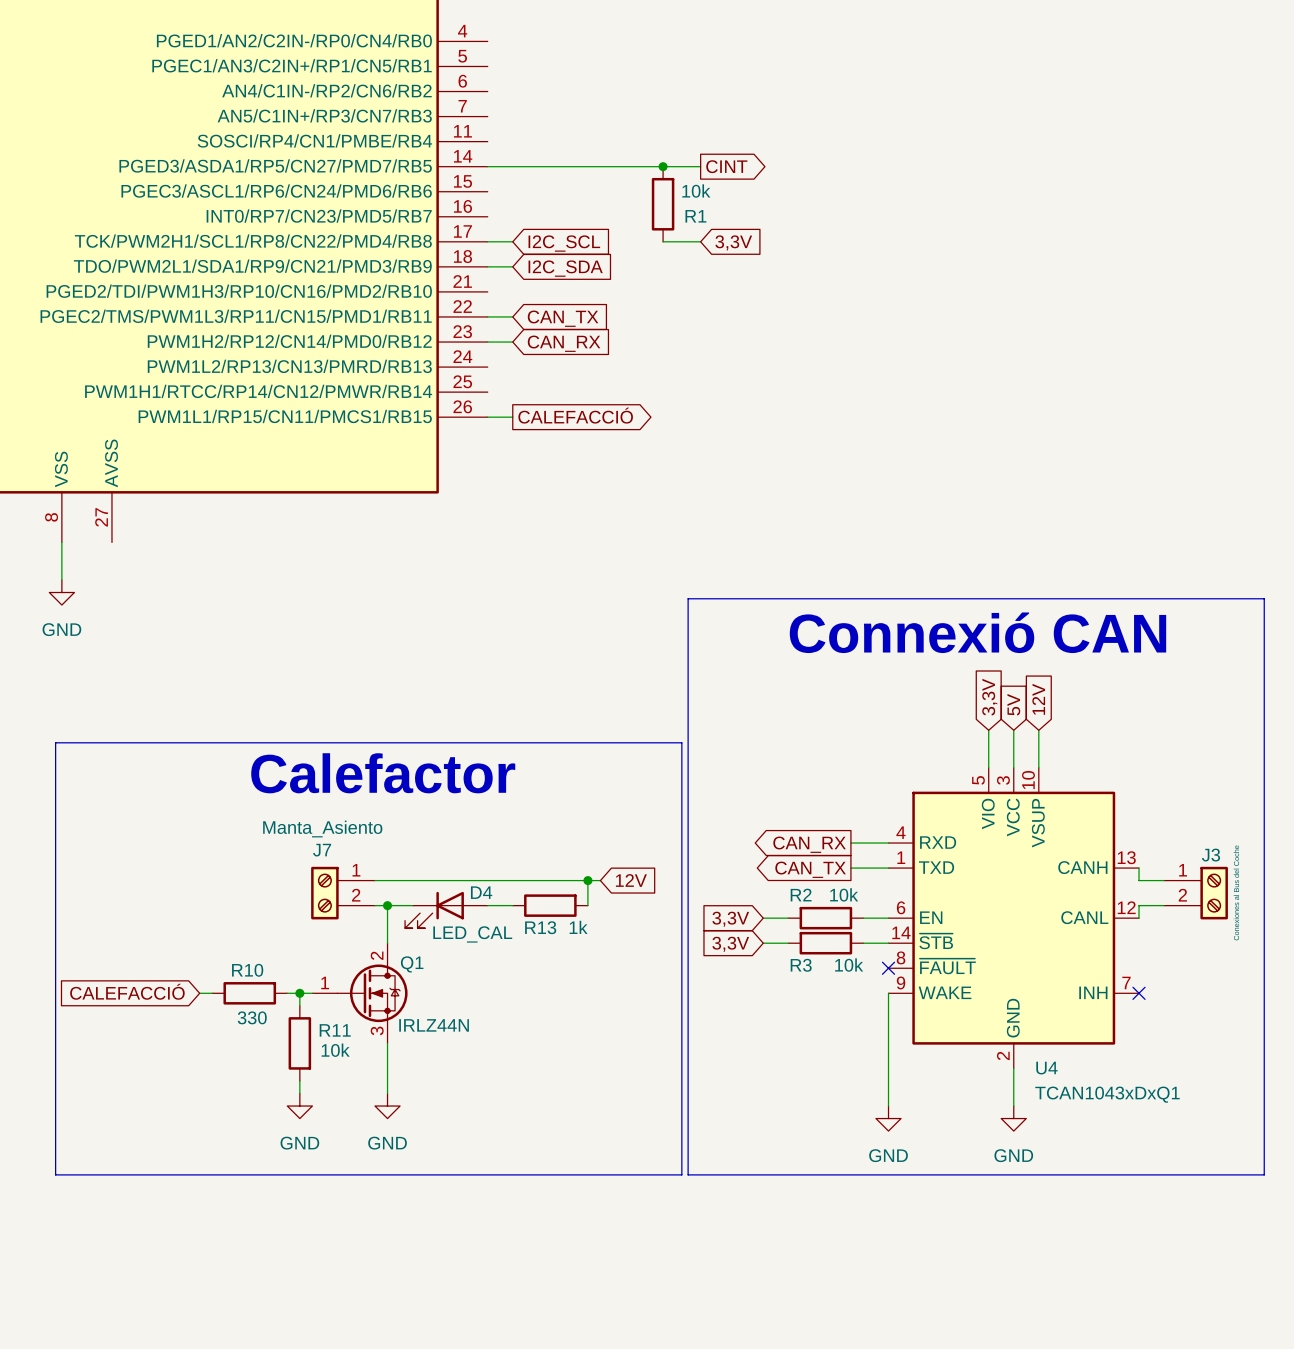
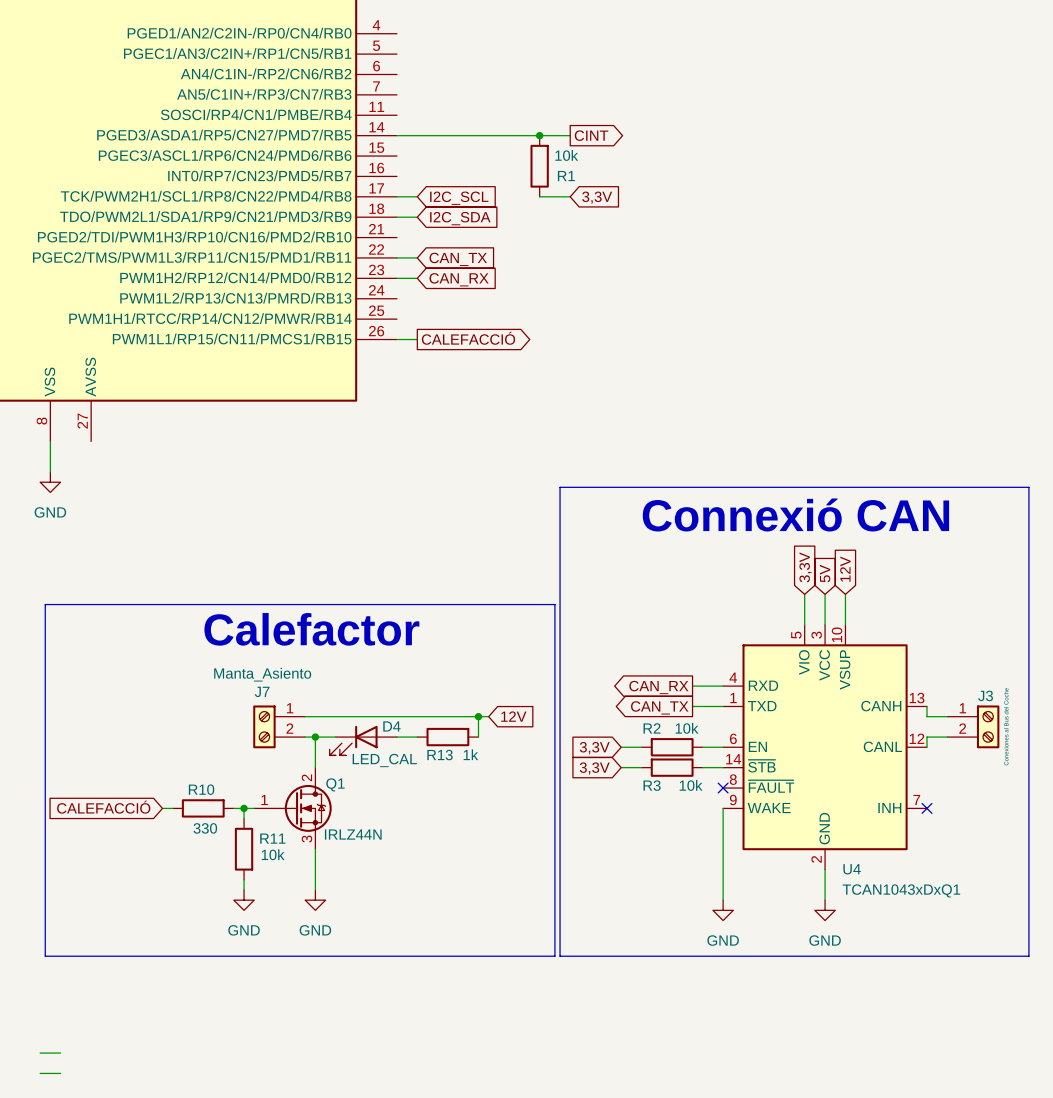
wire: none -> (40, 1053) (60, 1053)
wire: none -> (40, 1073) (60, 1073)

